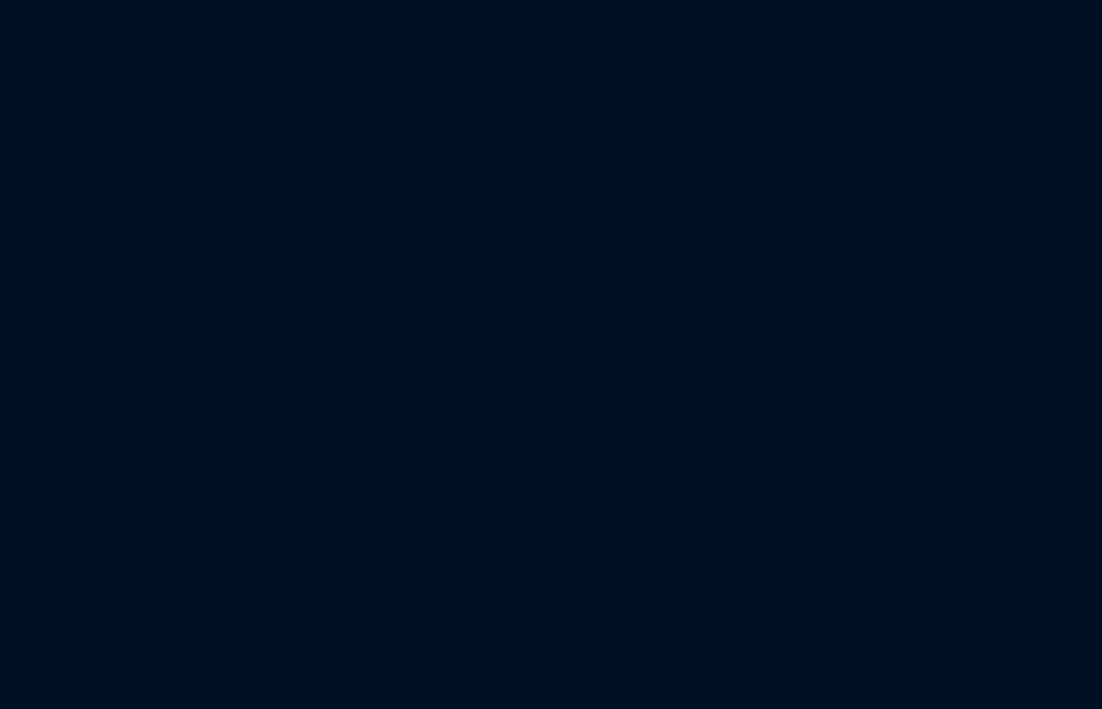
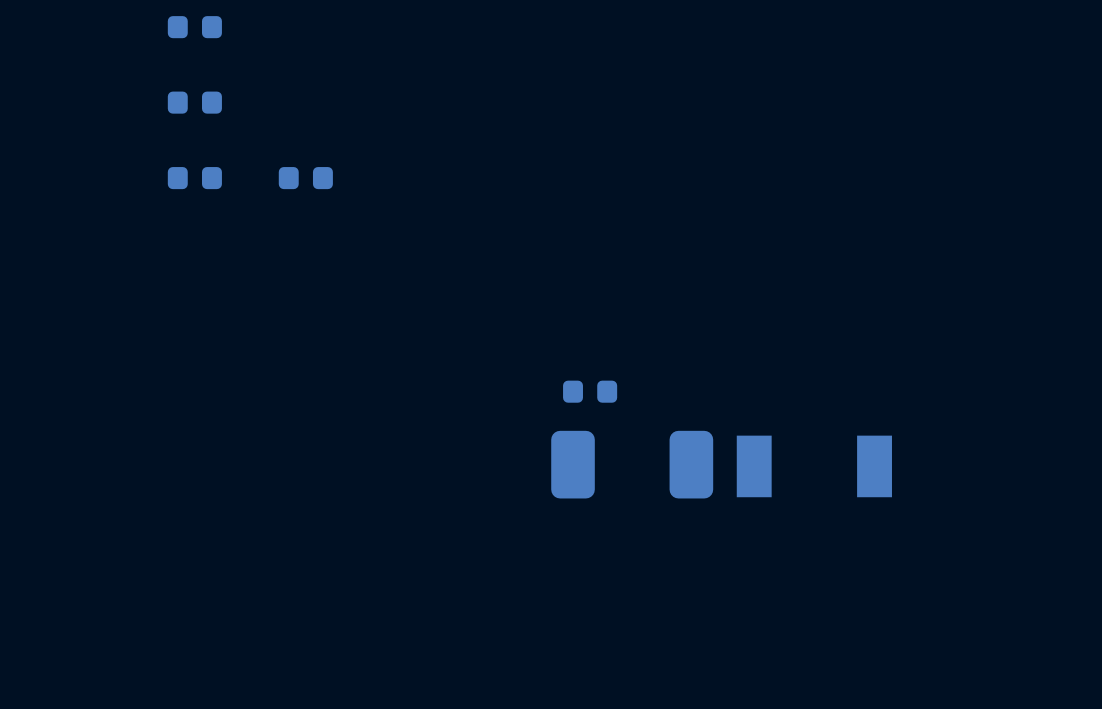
part: none -> (194, 27)
part: none -> (194, 102)
part: none -> (194, 178)
part: none -> (305, 178)
part: none -> (590, 391)
part: none -> (632, 464)
part: none -> (814, 466)

